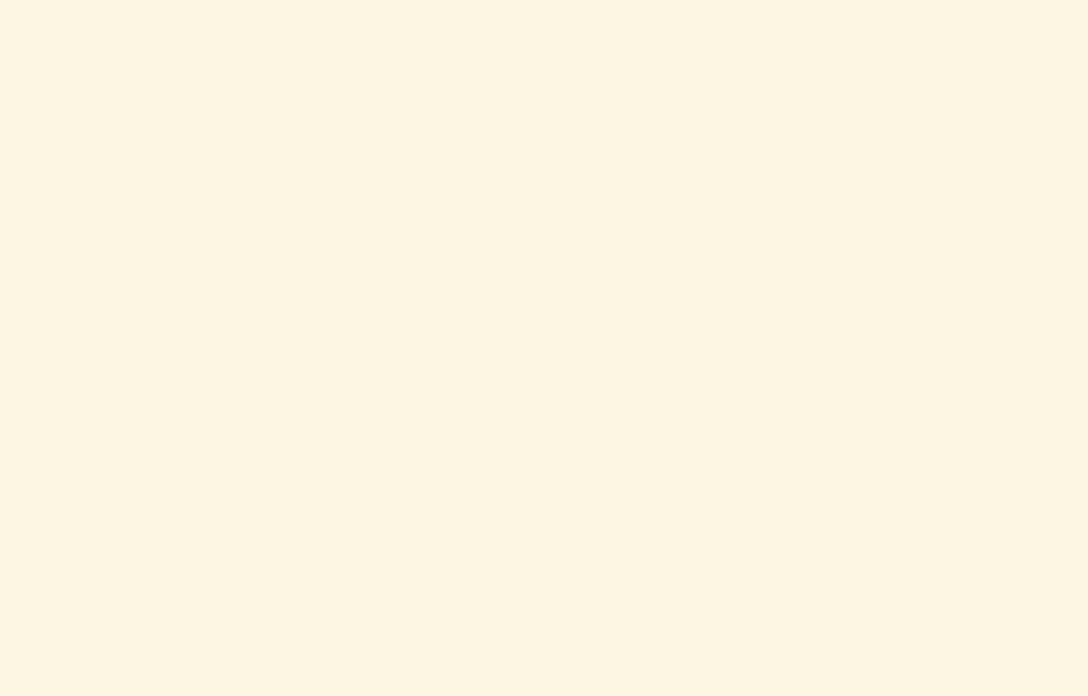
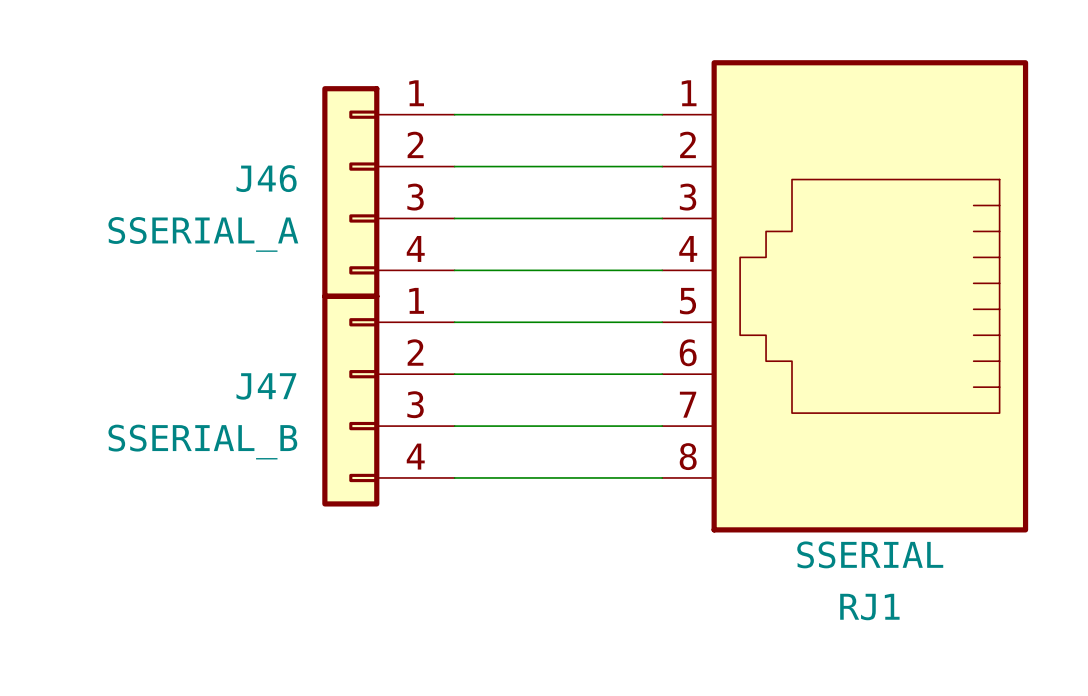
wire: none -> (454, 114) (662, 114)
wire: none -> (454, 166) (662, 166)
J46: none -> SSERIAL_A (388, 192)
wire: none -> (454, 218) (662, 218)
wire: none -> (454, 270) (662, 270)
RJ1: none -> SSERIAL (845, 296)
wire: none -> (454, 322) (662, 322)
wire: none -> (454, 374) (662, 374)
J47: none -> SSERIAL_B (388, 400)
wire: none -> (454, 426) (662, 426)
wire: none -> (454, 477) (662, 477)

